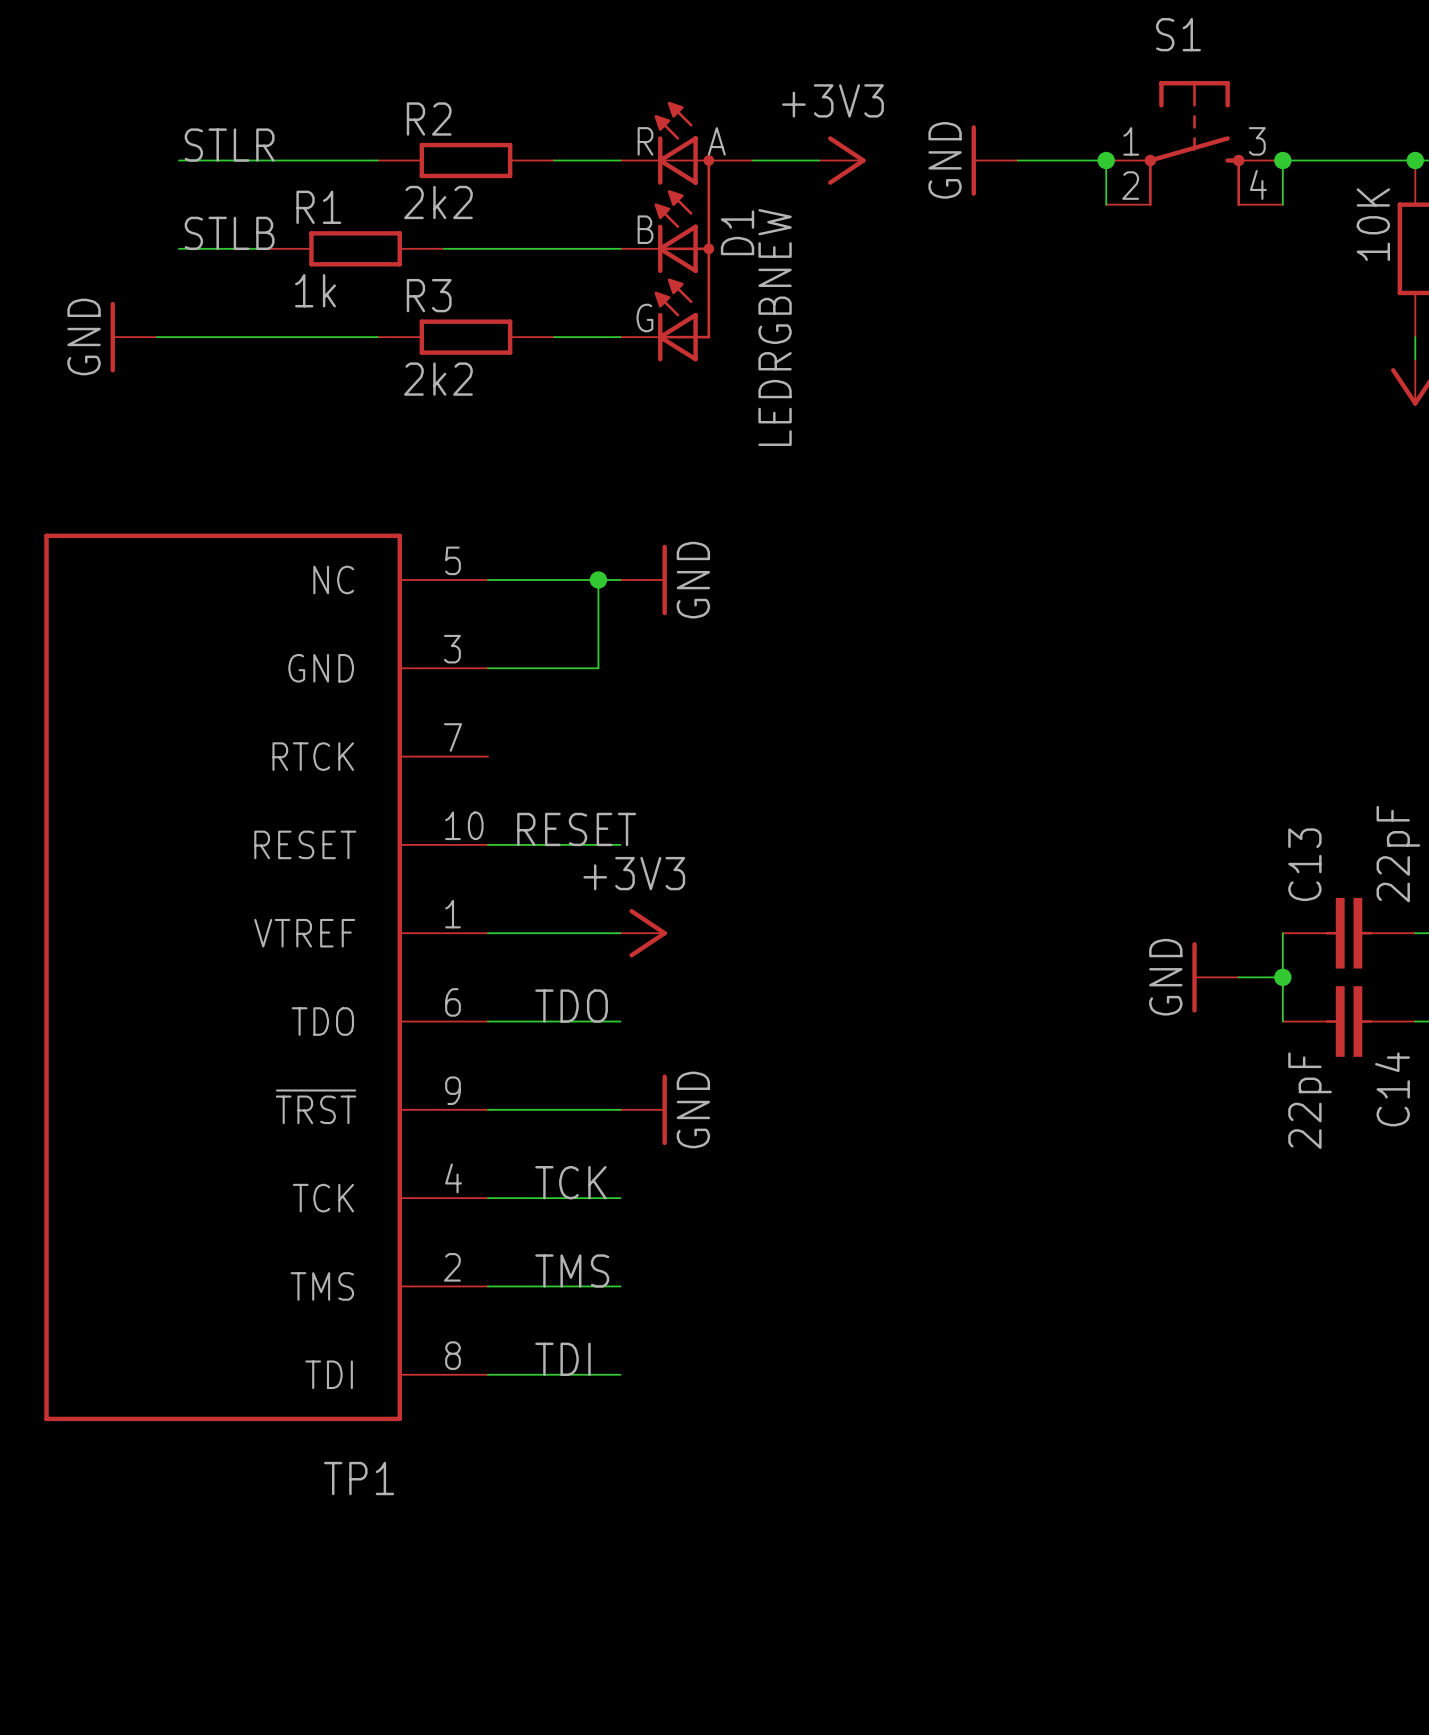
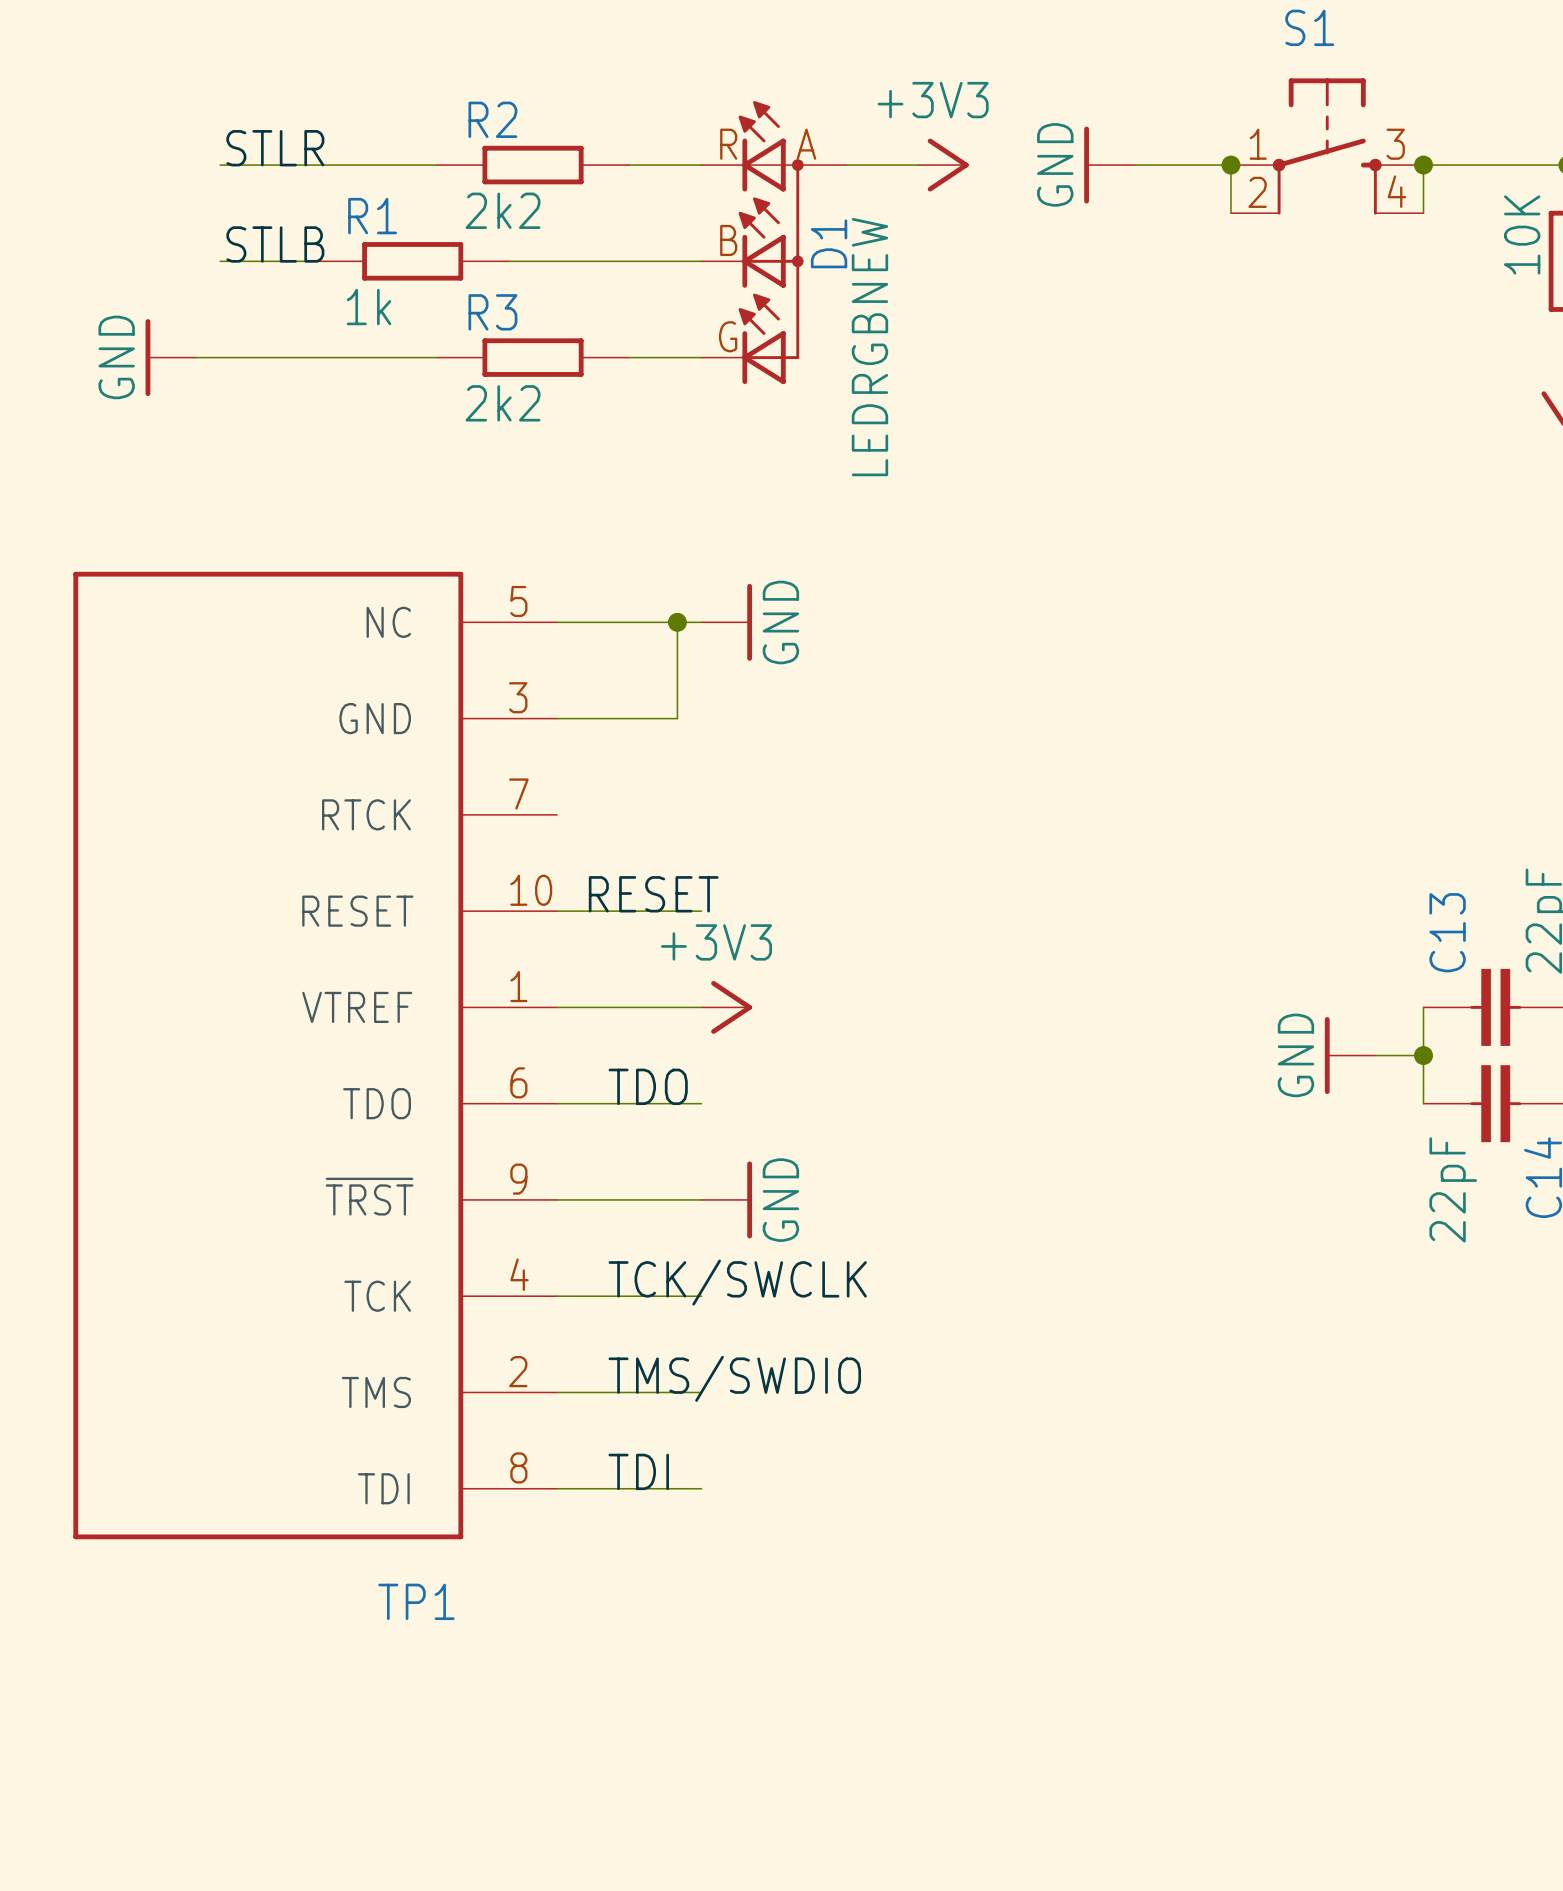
label: TCK (570, 1182) -> TCK/SWCLK (737, 1282)
label: TMS (572, 1270) -> TMS/SWDIO (734, 1378)

